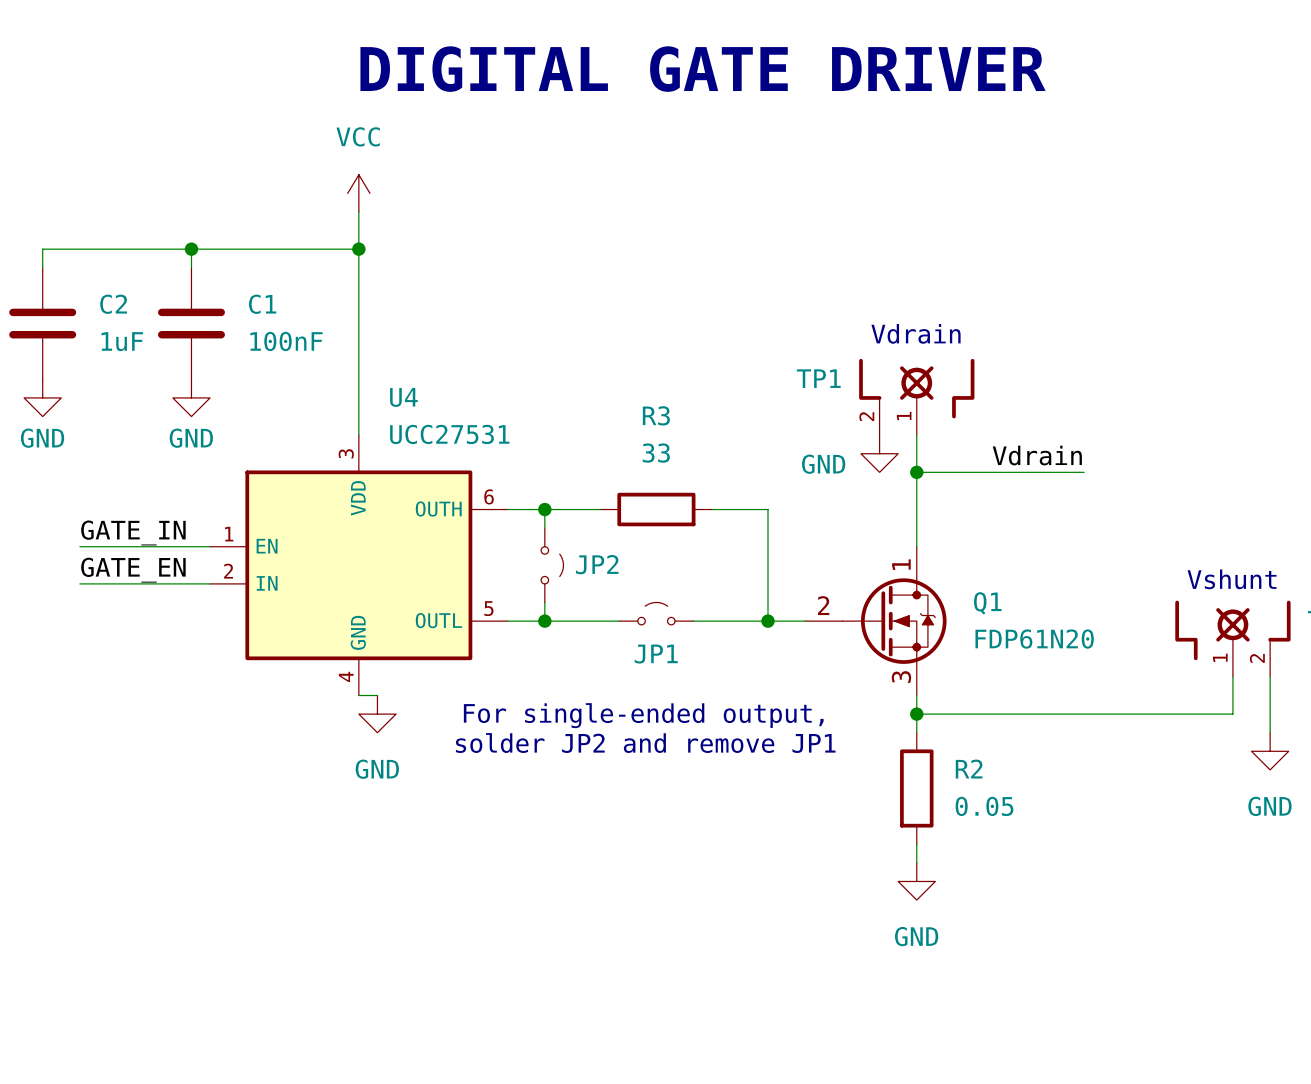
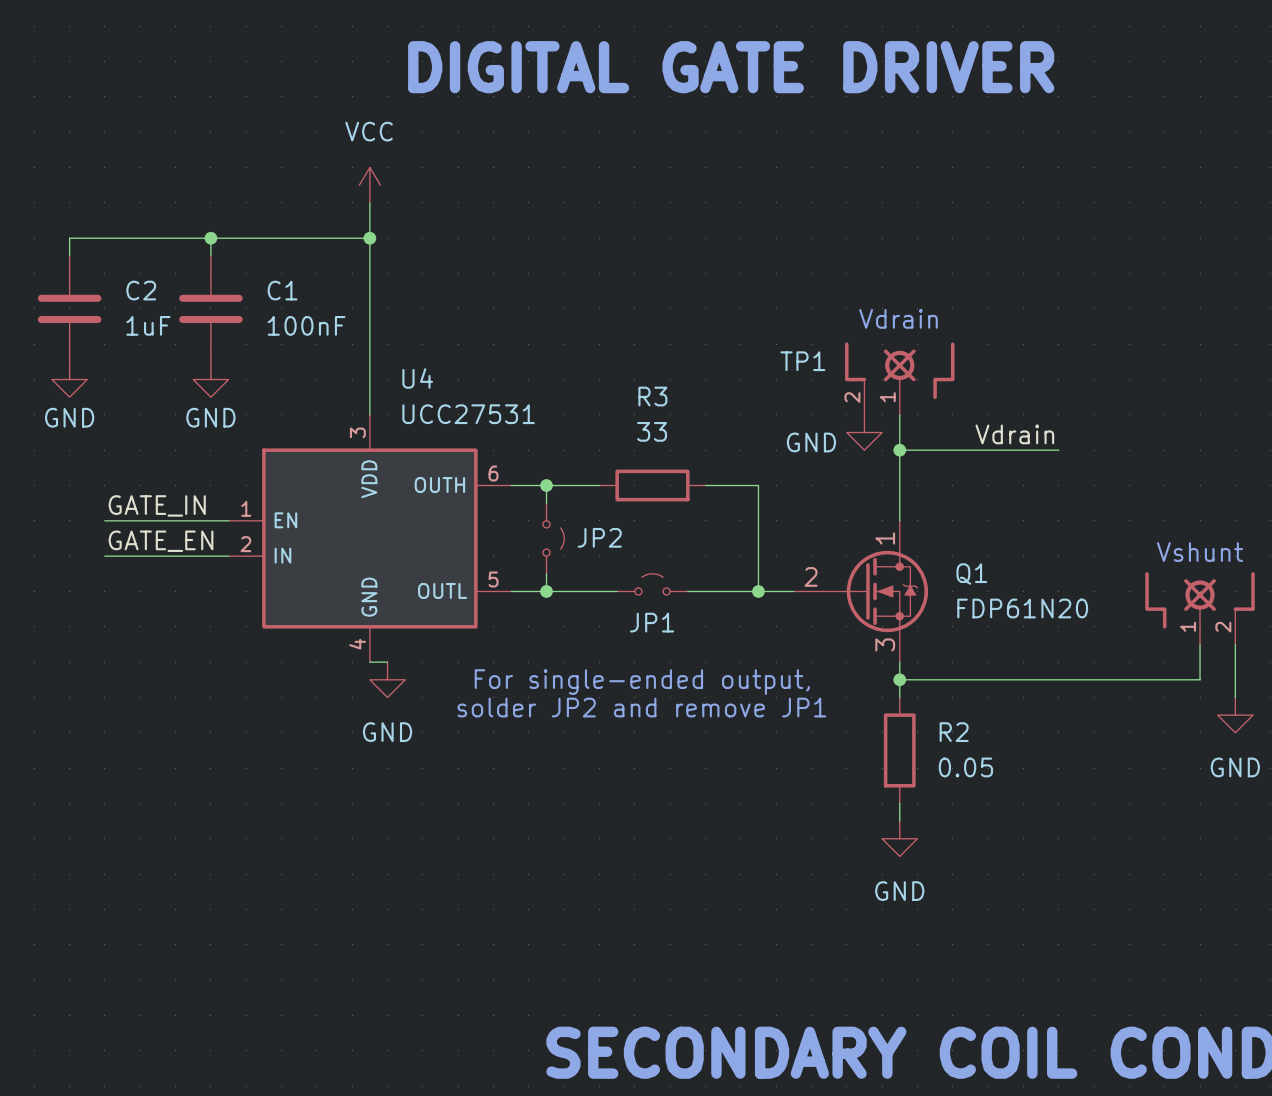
text position: DIGITAL GATE DRIVER (703, 69) -> DIGITAL GATE DRIVER (731, 67)

